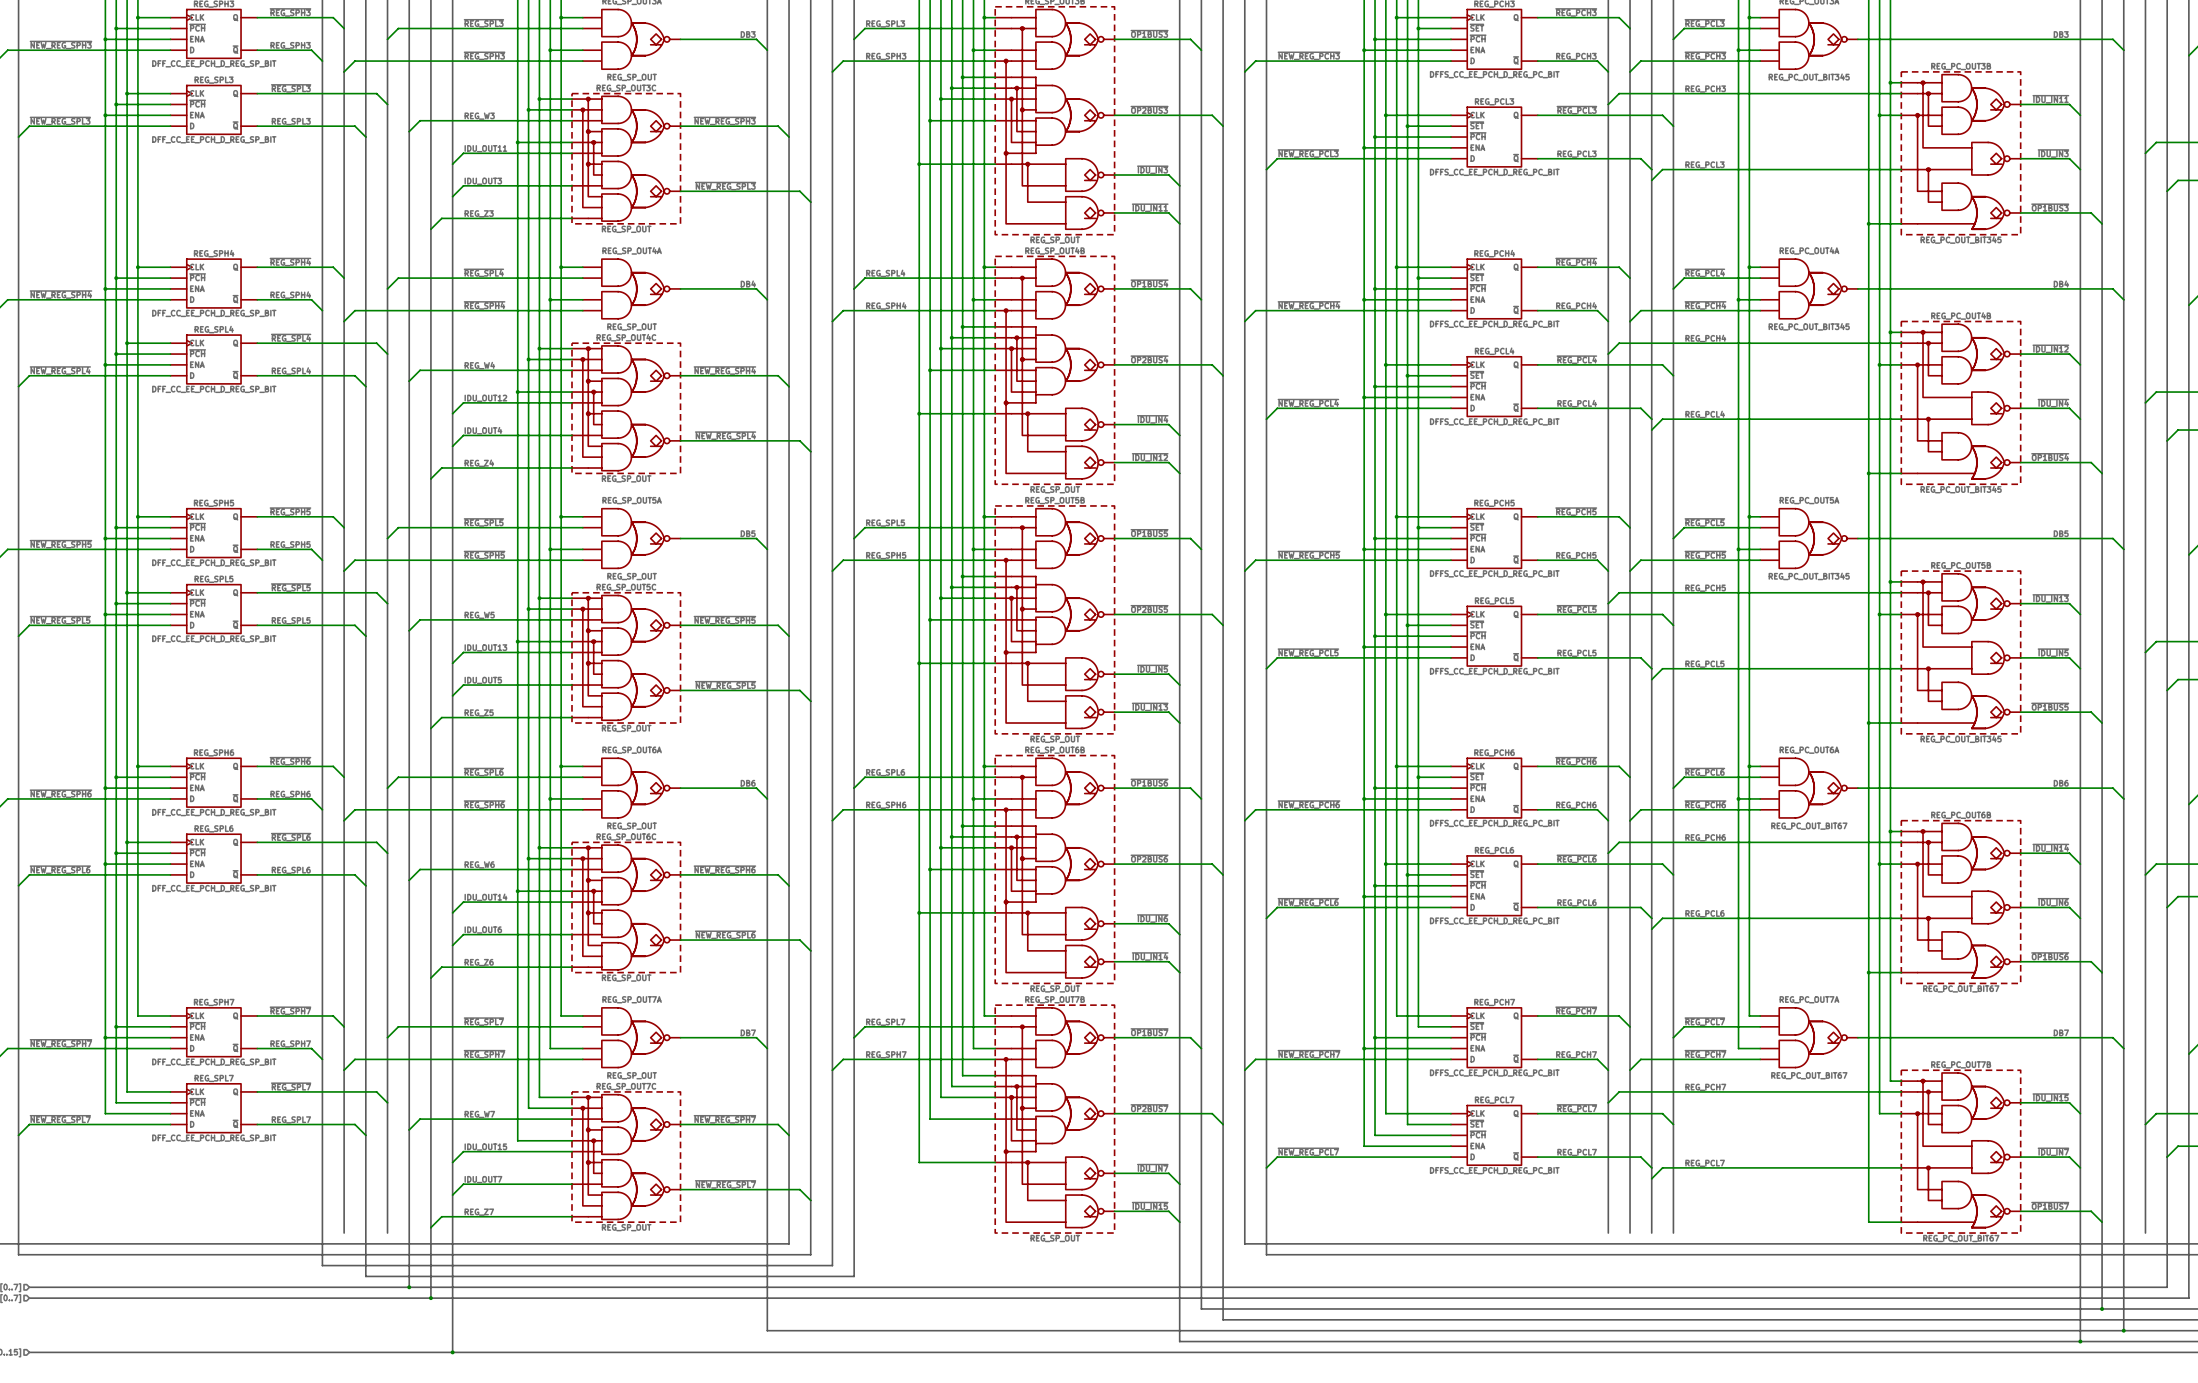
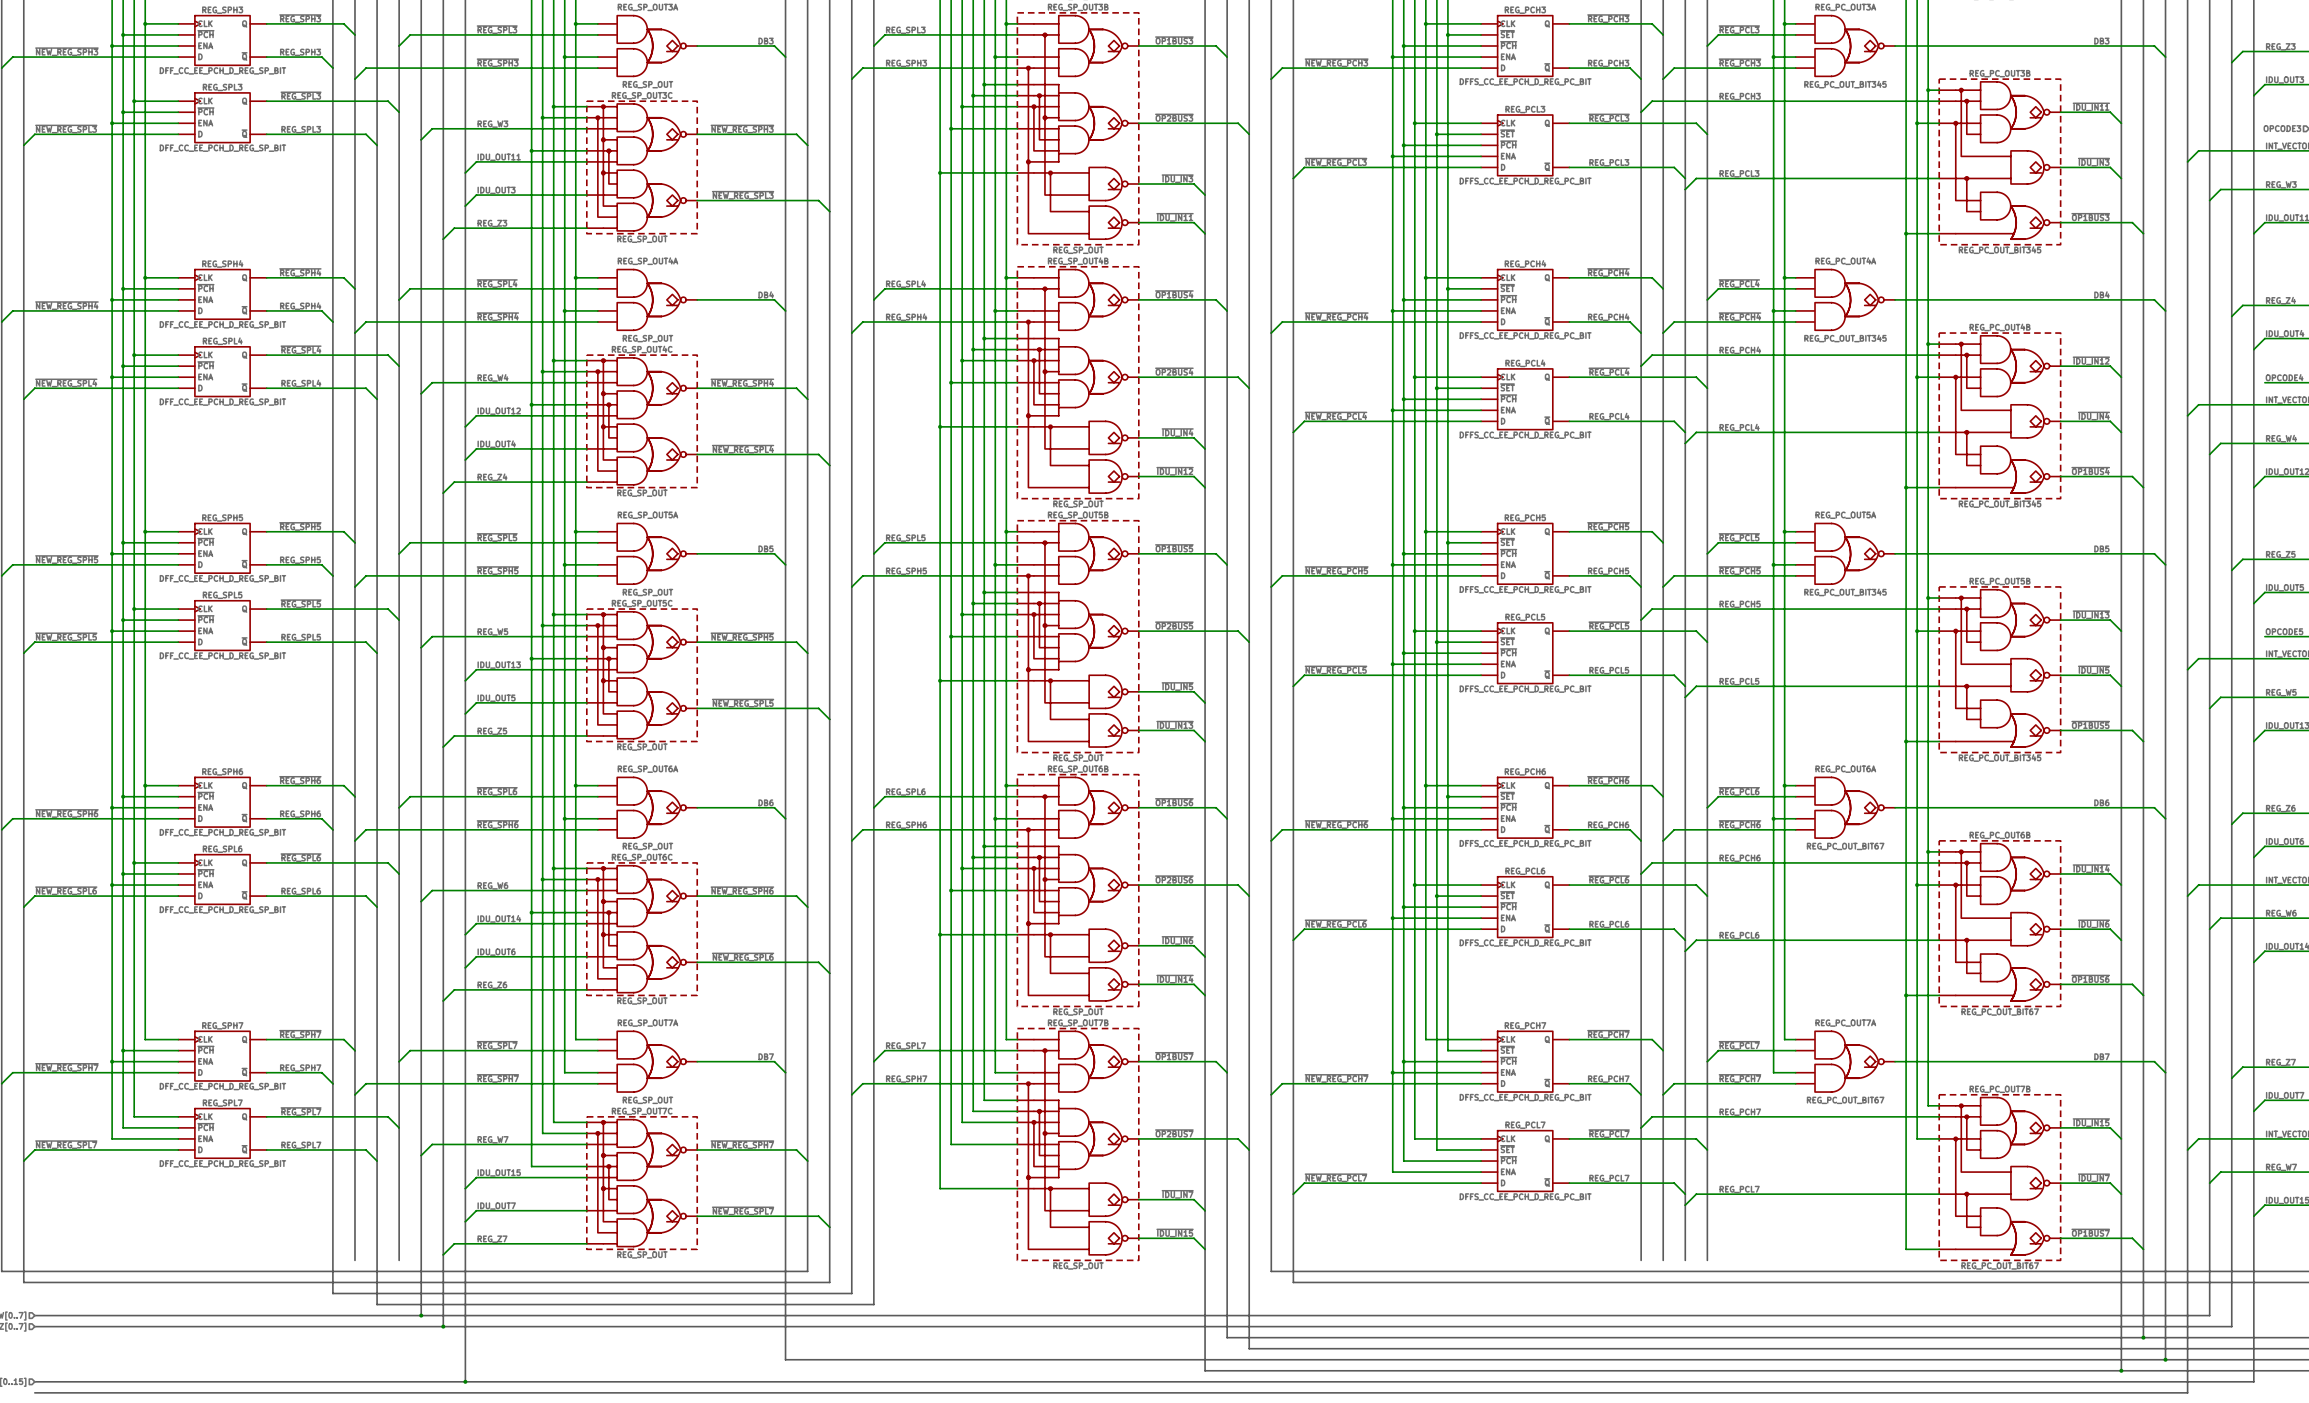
bus: none -> (2187, 1260) (2187, 1392) (34, 1392)

